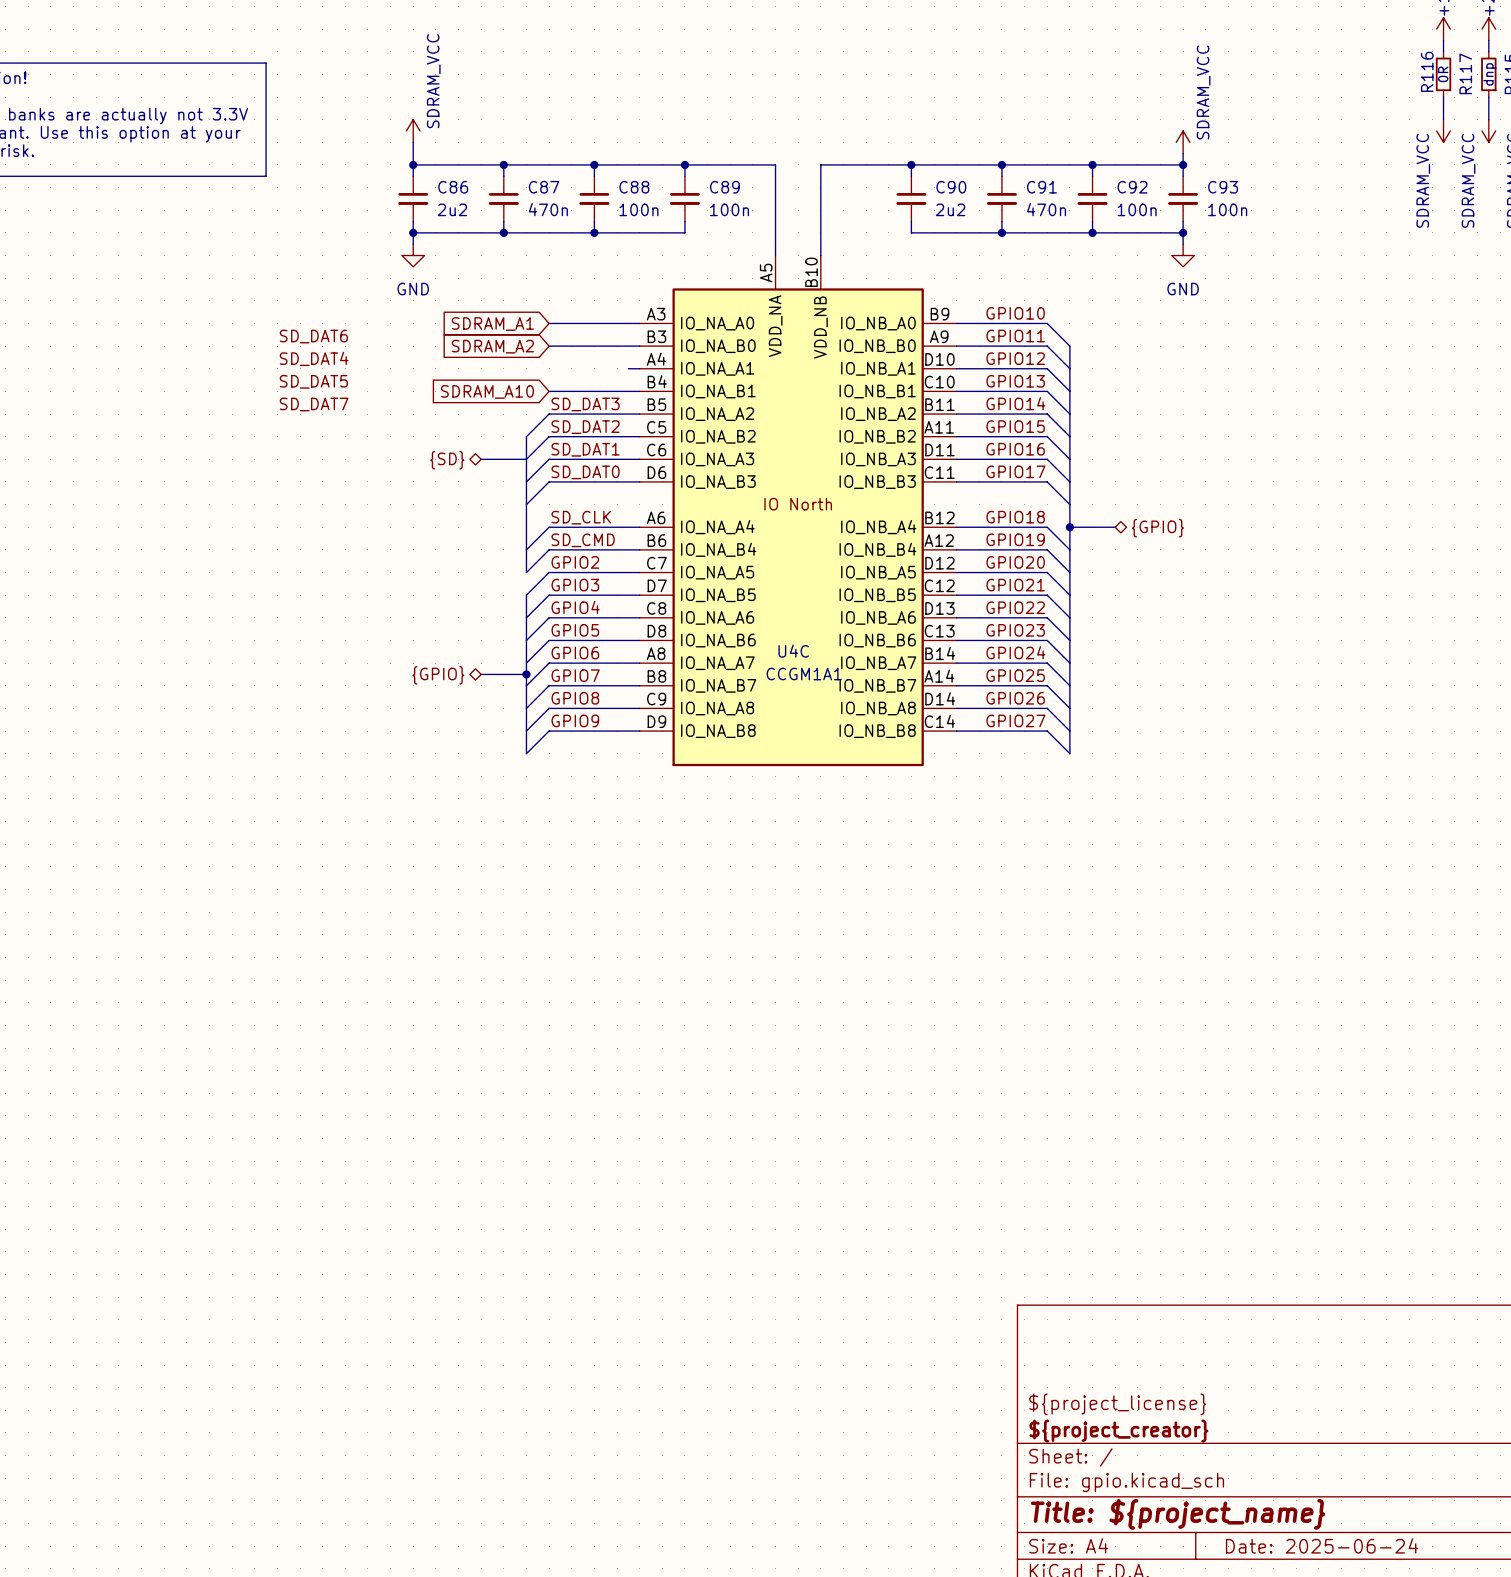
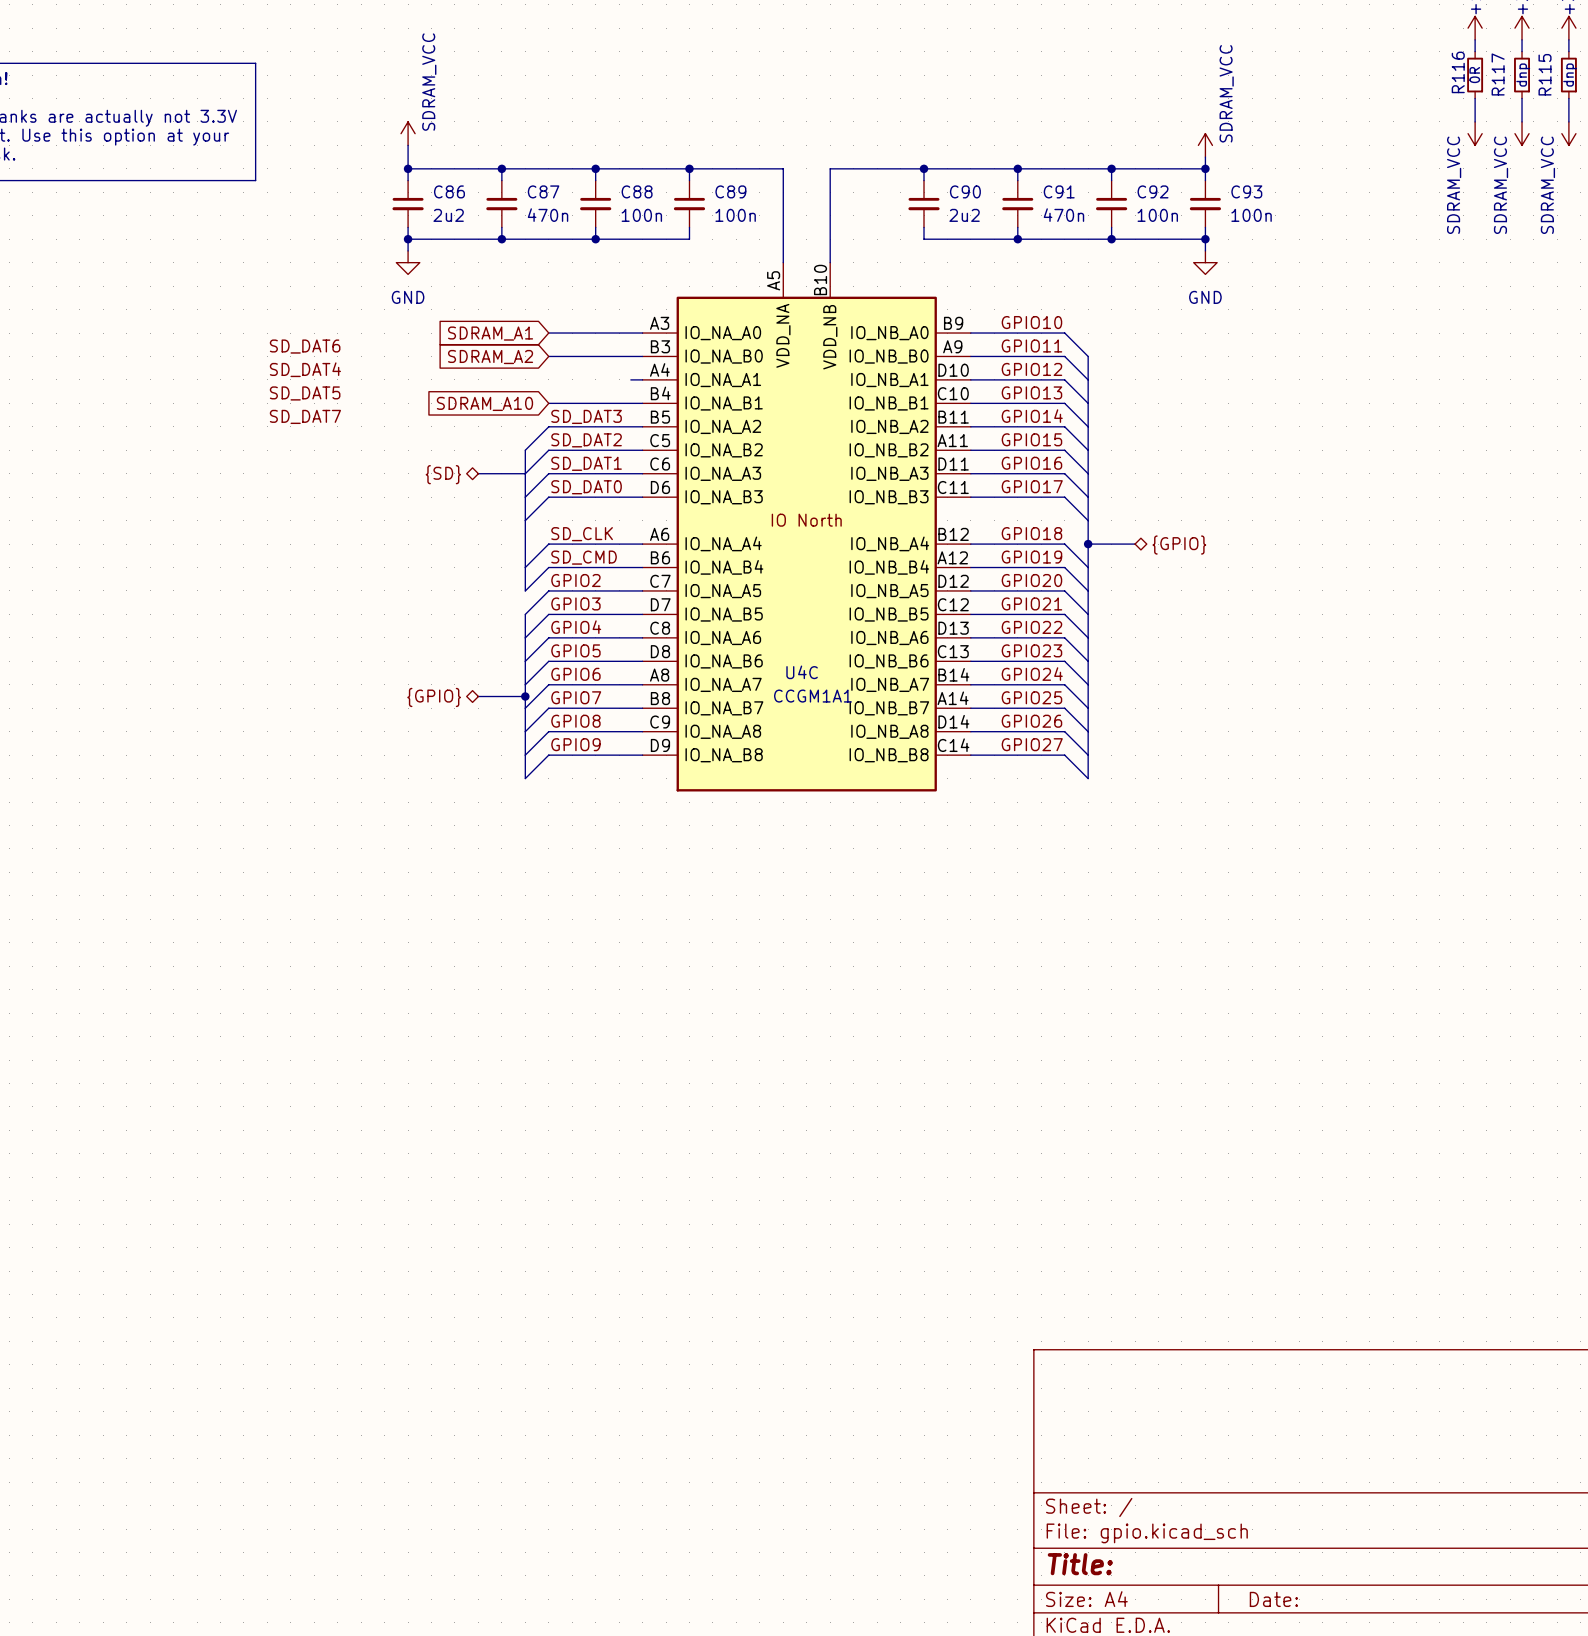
title block: ${project_license} (1117, 1404) -> none
title block: ${project_creator} (1118, 1431) -> none
title block: Title: ${project_name} (1178, 1514) -> Title: (1080, 1564)
title block: Date: 2025-06-24 (1322, 1545) -> Date: (1273, 1599)

